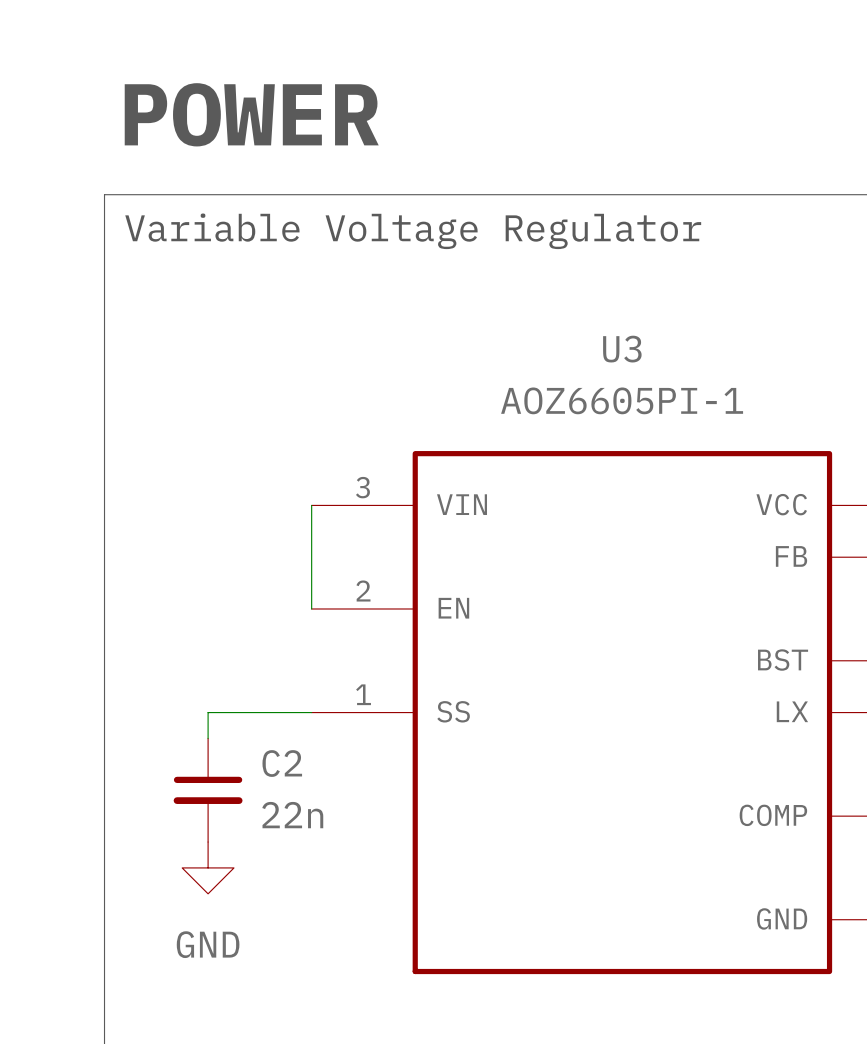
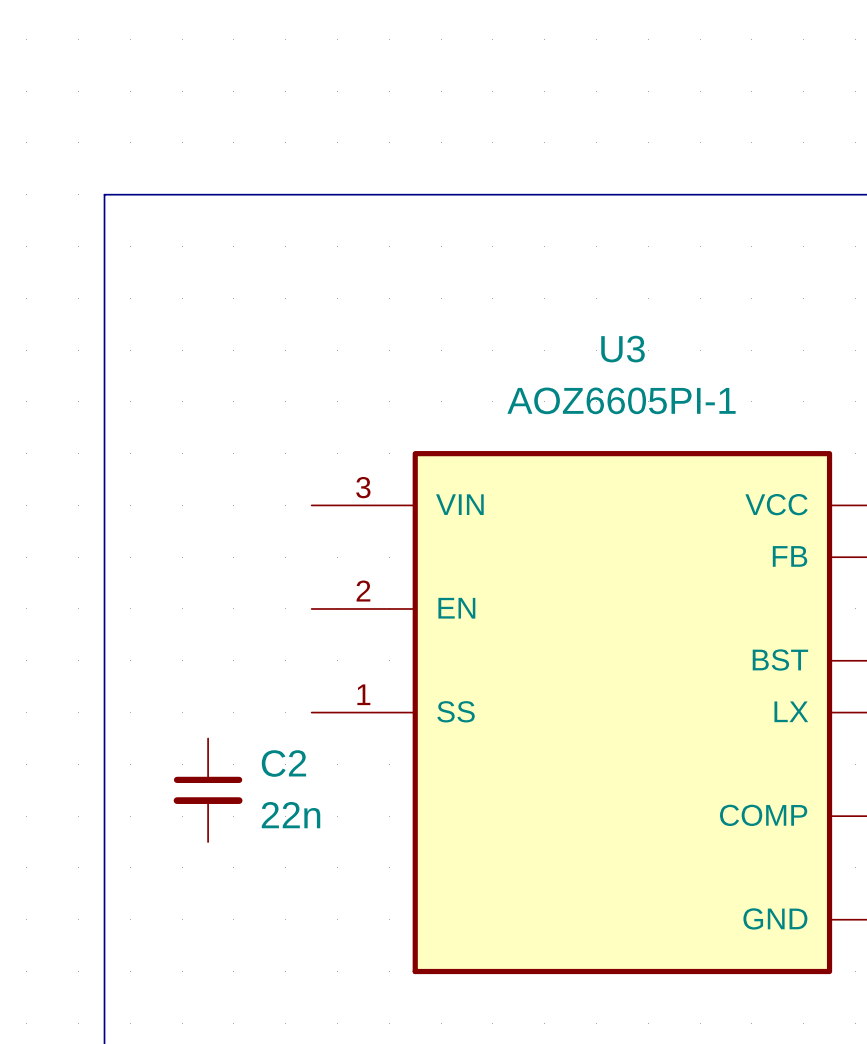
text: POWER (251, 114) -> none
text: Variable Voltage Regulator (413, 231) -> none
wire: (311, 505) (311, 608) -> none
wire: (311, 712) (208, 712) (208, 738) -> none
power symbol: GND (208, 867) -> none

